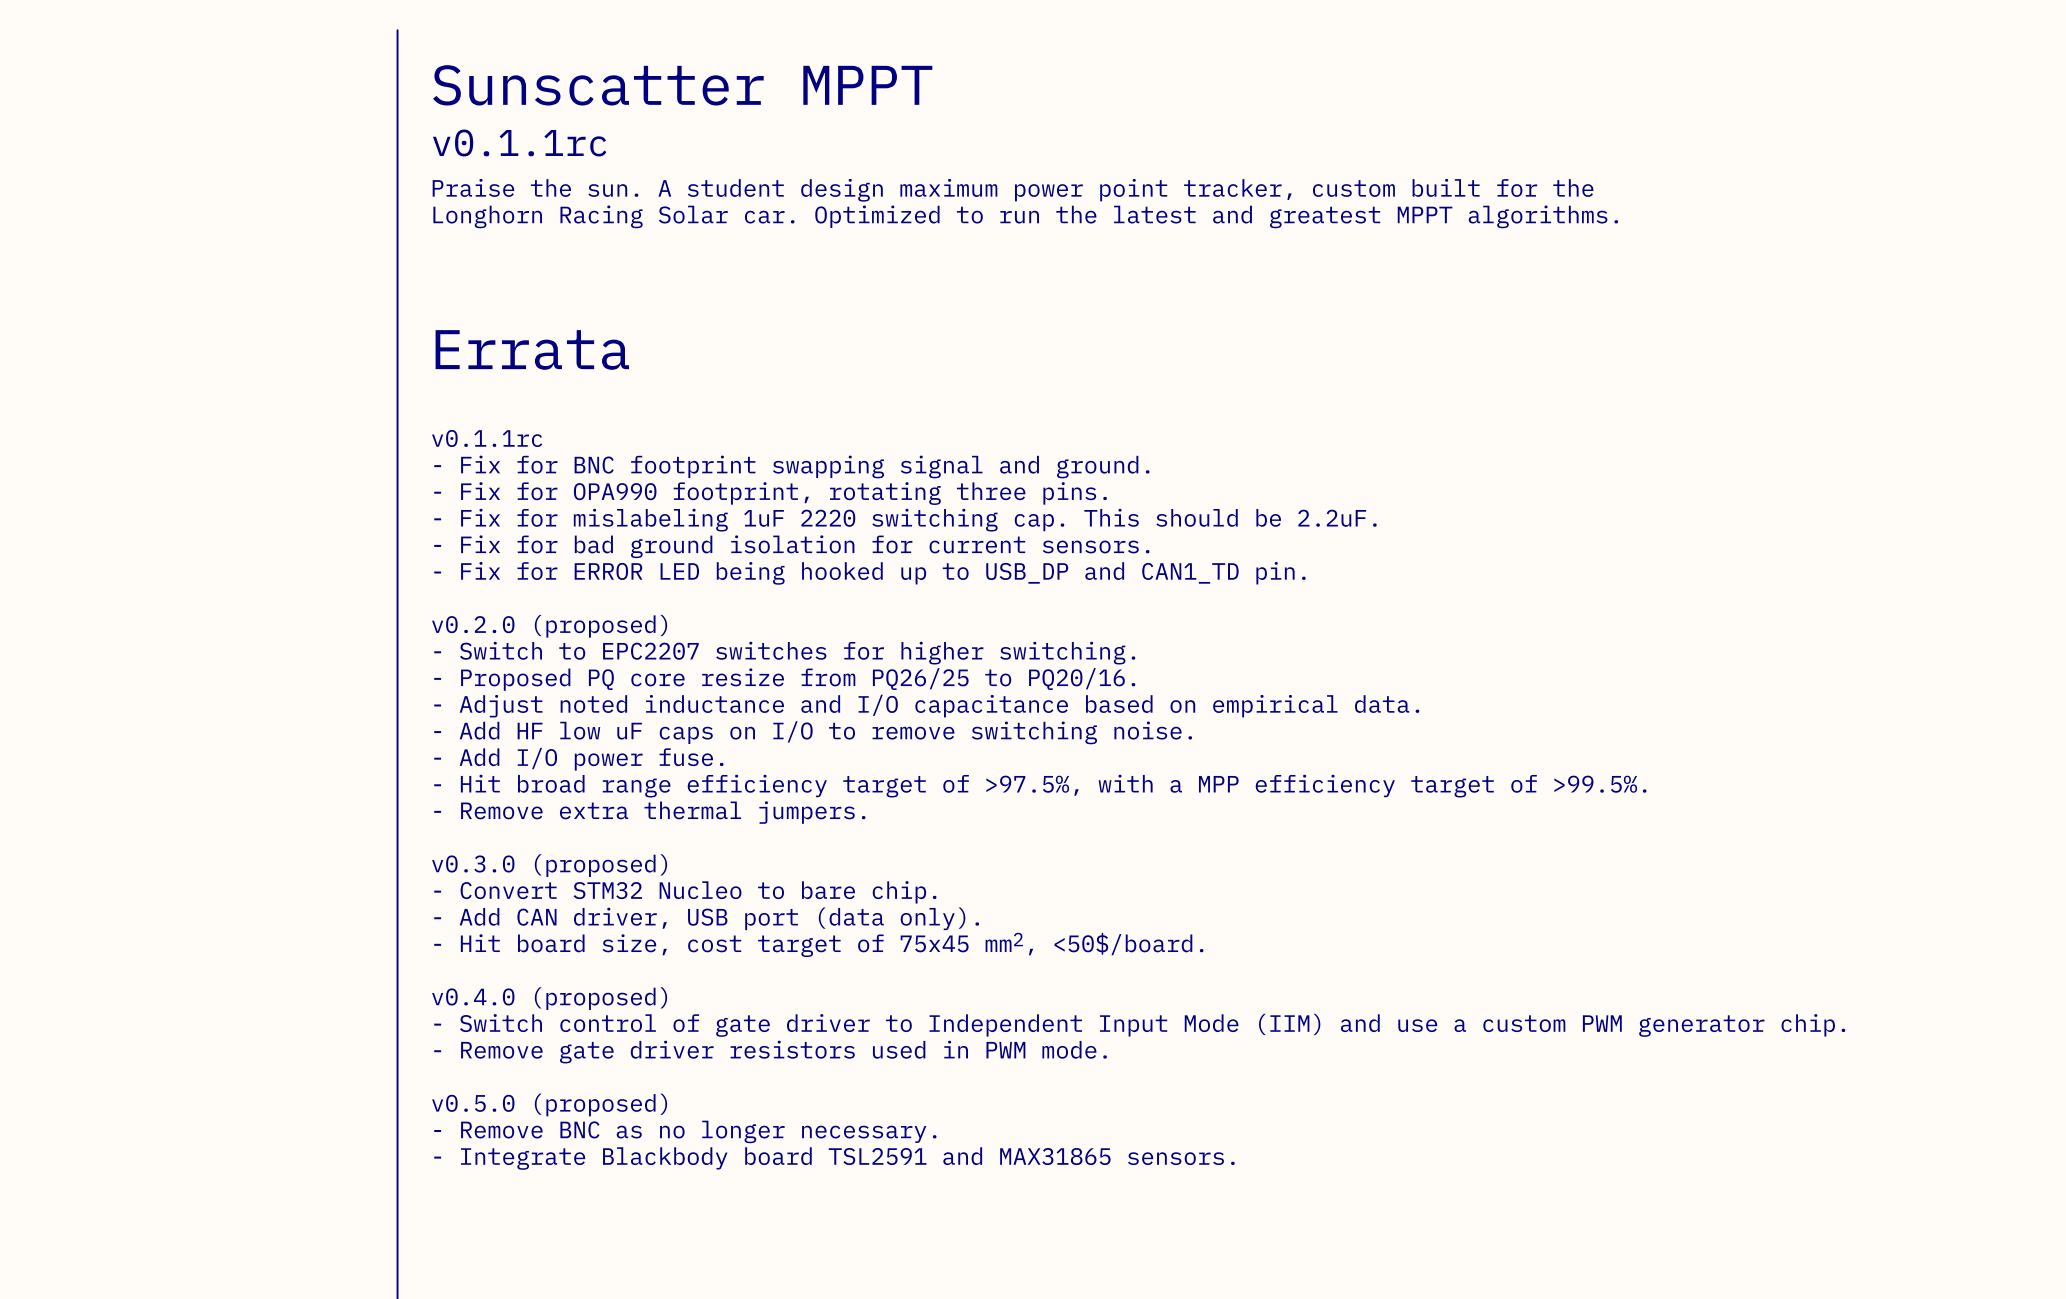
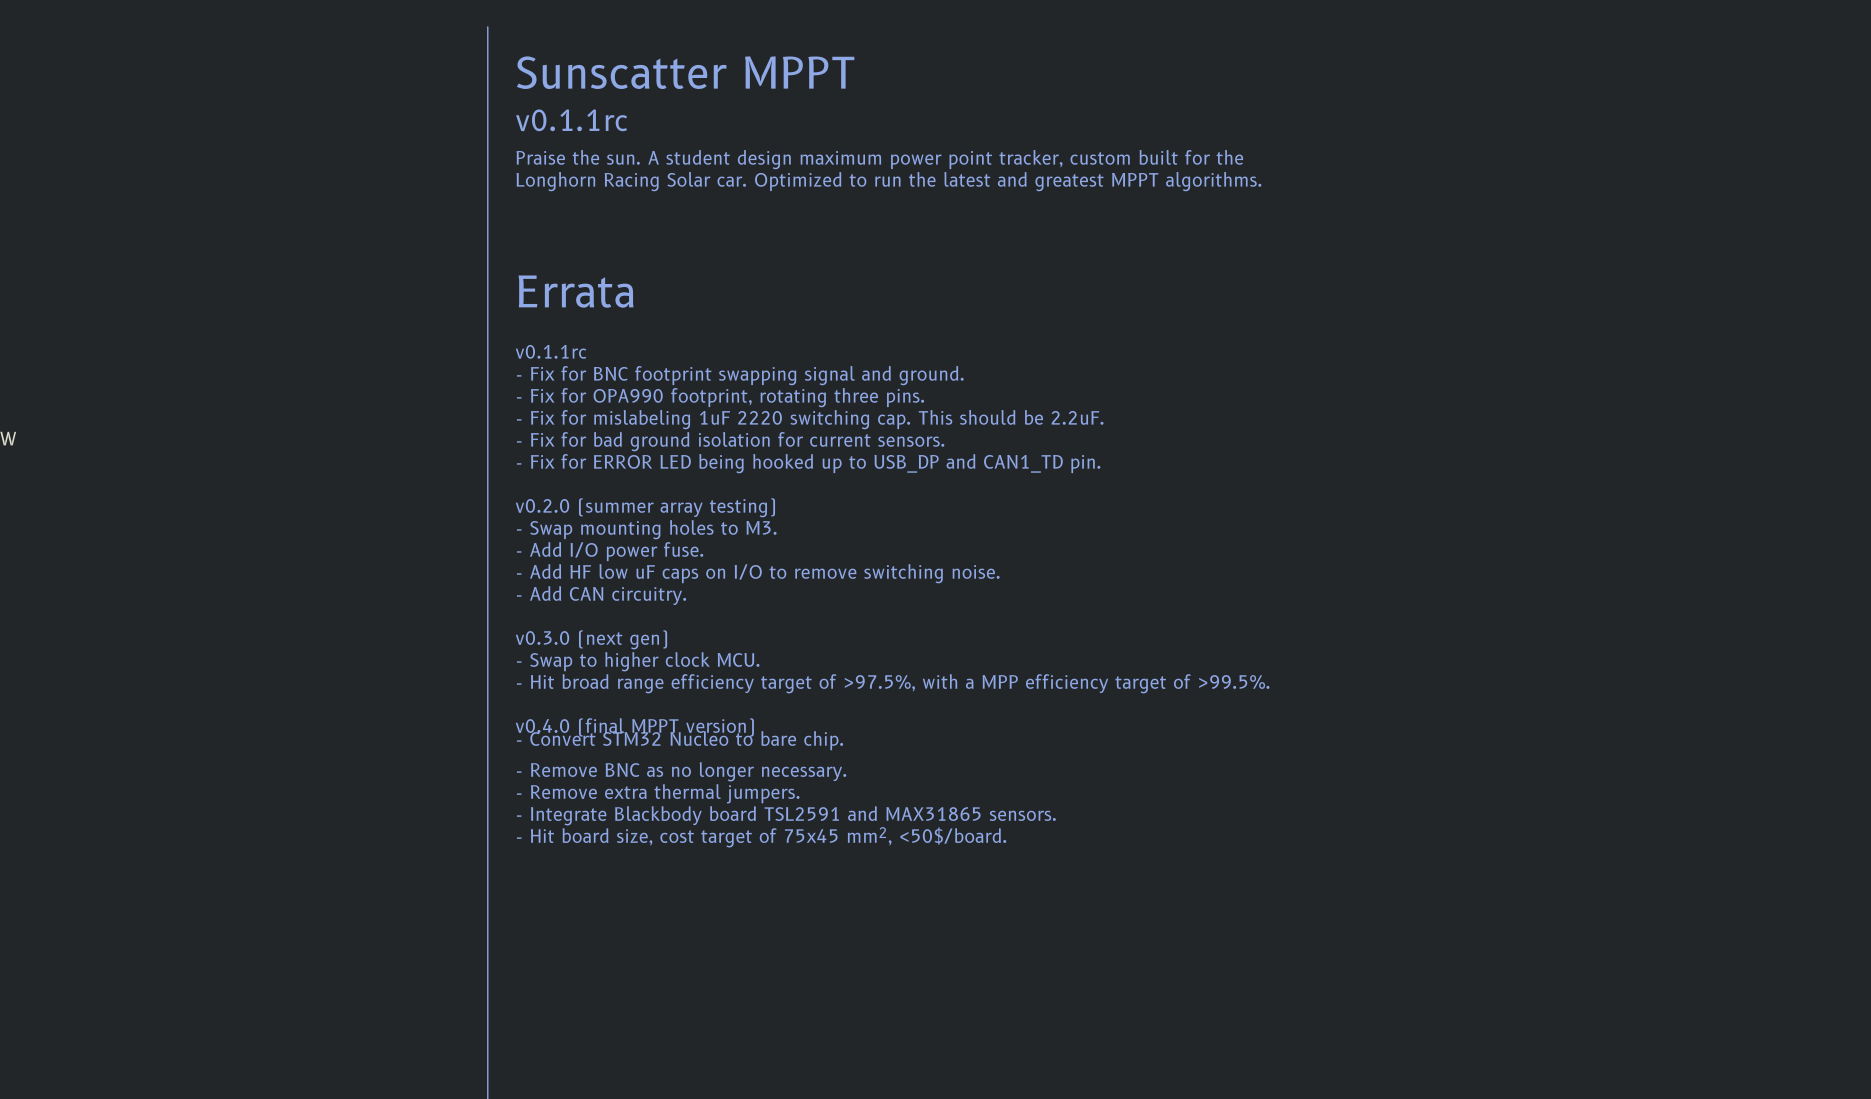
text position: v0.1.1rc (487, 438) -> v0.1.1rc (551, 351)
text position: - Fix for BNC footprint swapping signal and ground. (791, 466) -> - Fix for BNC footprint swapping signal and ground. (740, 375)
text position: - Fix for OPA990 footprint, rotating three pins. (770, 493) -> - Fix for OPA990 footprint, rotating three pins. (720, 397)
text position: - Fix for mislabeling 1uF 2220 switching cap. This should be 2.2uF. (905, 520) -> - Fix for mislabeling 1uF 2220 switching cap. This should be 2.2uF. (810, 419)
text position: - Fix for bad ground isolation for current sensors. (791, 546) -> - Fix for bad ground isolation for current sensors. (730, 441)
text position: - Fix for ERROR LED being hooked up to USB_DP and CAN1_TD pin. (869, 573) -> - Fix for ERROR LED being hooked up to USB_DP and CAN1_TD pin. (808, 463)
text: none -> v0.2.0 (summer array testing) (645, 507)
text: v0.2.0 (proposed) (549, 626) -> none
text: none -> - Swap mounting holes to M3. (646, 529)
text: - Switch to EPC2207 switches for higher switching. (784, 653) -> none
text: - Proposed PQ core resize from PQ26/25 to PQ20/16. (784, 679) -> none
text: - Adjust noted inductance and I/O capacitance based on empirical data. (926, 706) -> - Add CAN circuitry. (601, 595)
text position: - Add HF low uF caps on I/O to remove switching noise. (813, 732) -> - Add HF low uF caps on I/O to remove switching noise. (758, 573)
text position: - Add I/O power fuse. (578, 759) -> - Add I/O power fuse. (610, 551)
text: none -> v0.3.0 (next gen) (591, 639)
text position: - Hit broad range efficiency target of >97.5%, with a MPP efficiency target of >99.5%. (1040, 786) -> - Hit broad range efficiency target of >97.5%, with a MPP efficiency target of >99.5%. (893, 683)
text: none -> - Swap to higher clock MCU. (638, 661)
text position: - Remove extra thermal jumpers. (649, 812) -> - Remove extra thermal jumpers. (658, 793)
text: v0.3.0 (proposed) (549, 865) -> v0.4.0 (final MPPT version) (634, 727)
text: - Add CAN driver, USB port (data only). (706, 918) -> none
text position: - Hit board size, cost target of 75x45 mm2, <50$/board. (818, 944) -> - Hit board size, cost target of 75x45 mm2, <50$/board. (761, 837)
text: v0.4.0 (proposed) (549, 998) -> none
text: - Switch control of gate driver to Independent Input Mode (IIM) and use a custom PWM generator chip. (1139, 1025) -> none
text: - Remove gate driver resistors used in PWM mode. (770, 1052) -> none
text: v0.5.0 (proposed) (549, 1104) -> none
text position: - Remove BNC as no longer necessary. (685, 1131) -> - Remove BNC as no longer necessary. (681, 771)
text position: - Integrate Blackbody board TSL2591 and MAX31865 sensors. (834, 1158) -> - Integrate Blackbody board TSL2591 and MAX31865 sensors. (786, 815)

